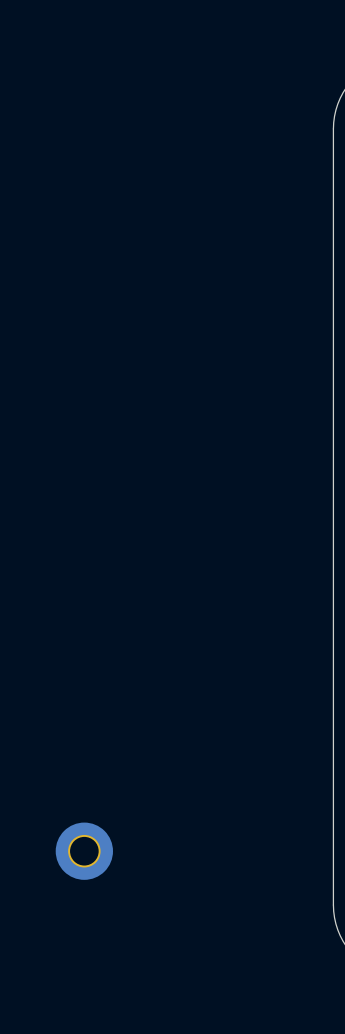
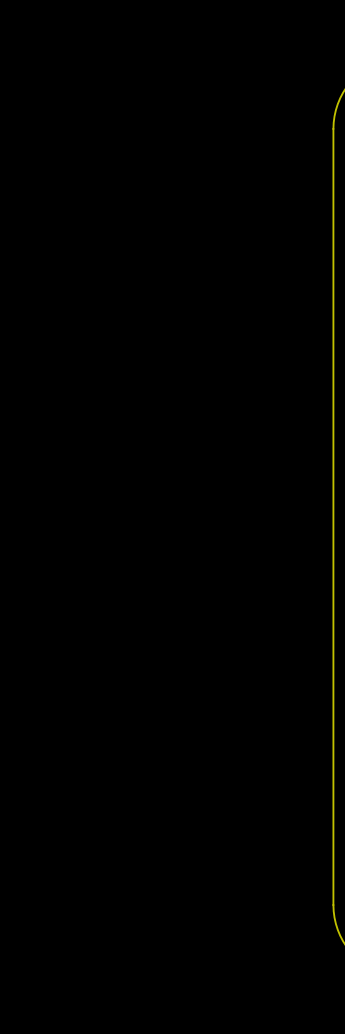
part: (84, 851) -> none

